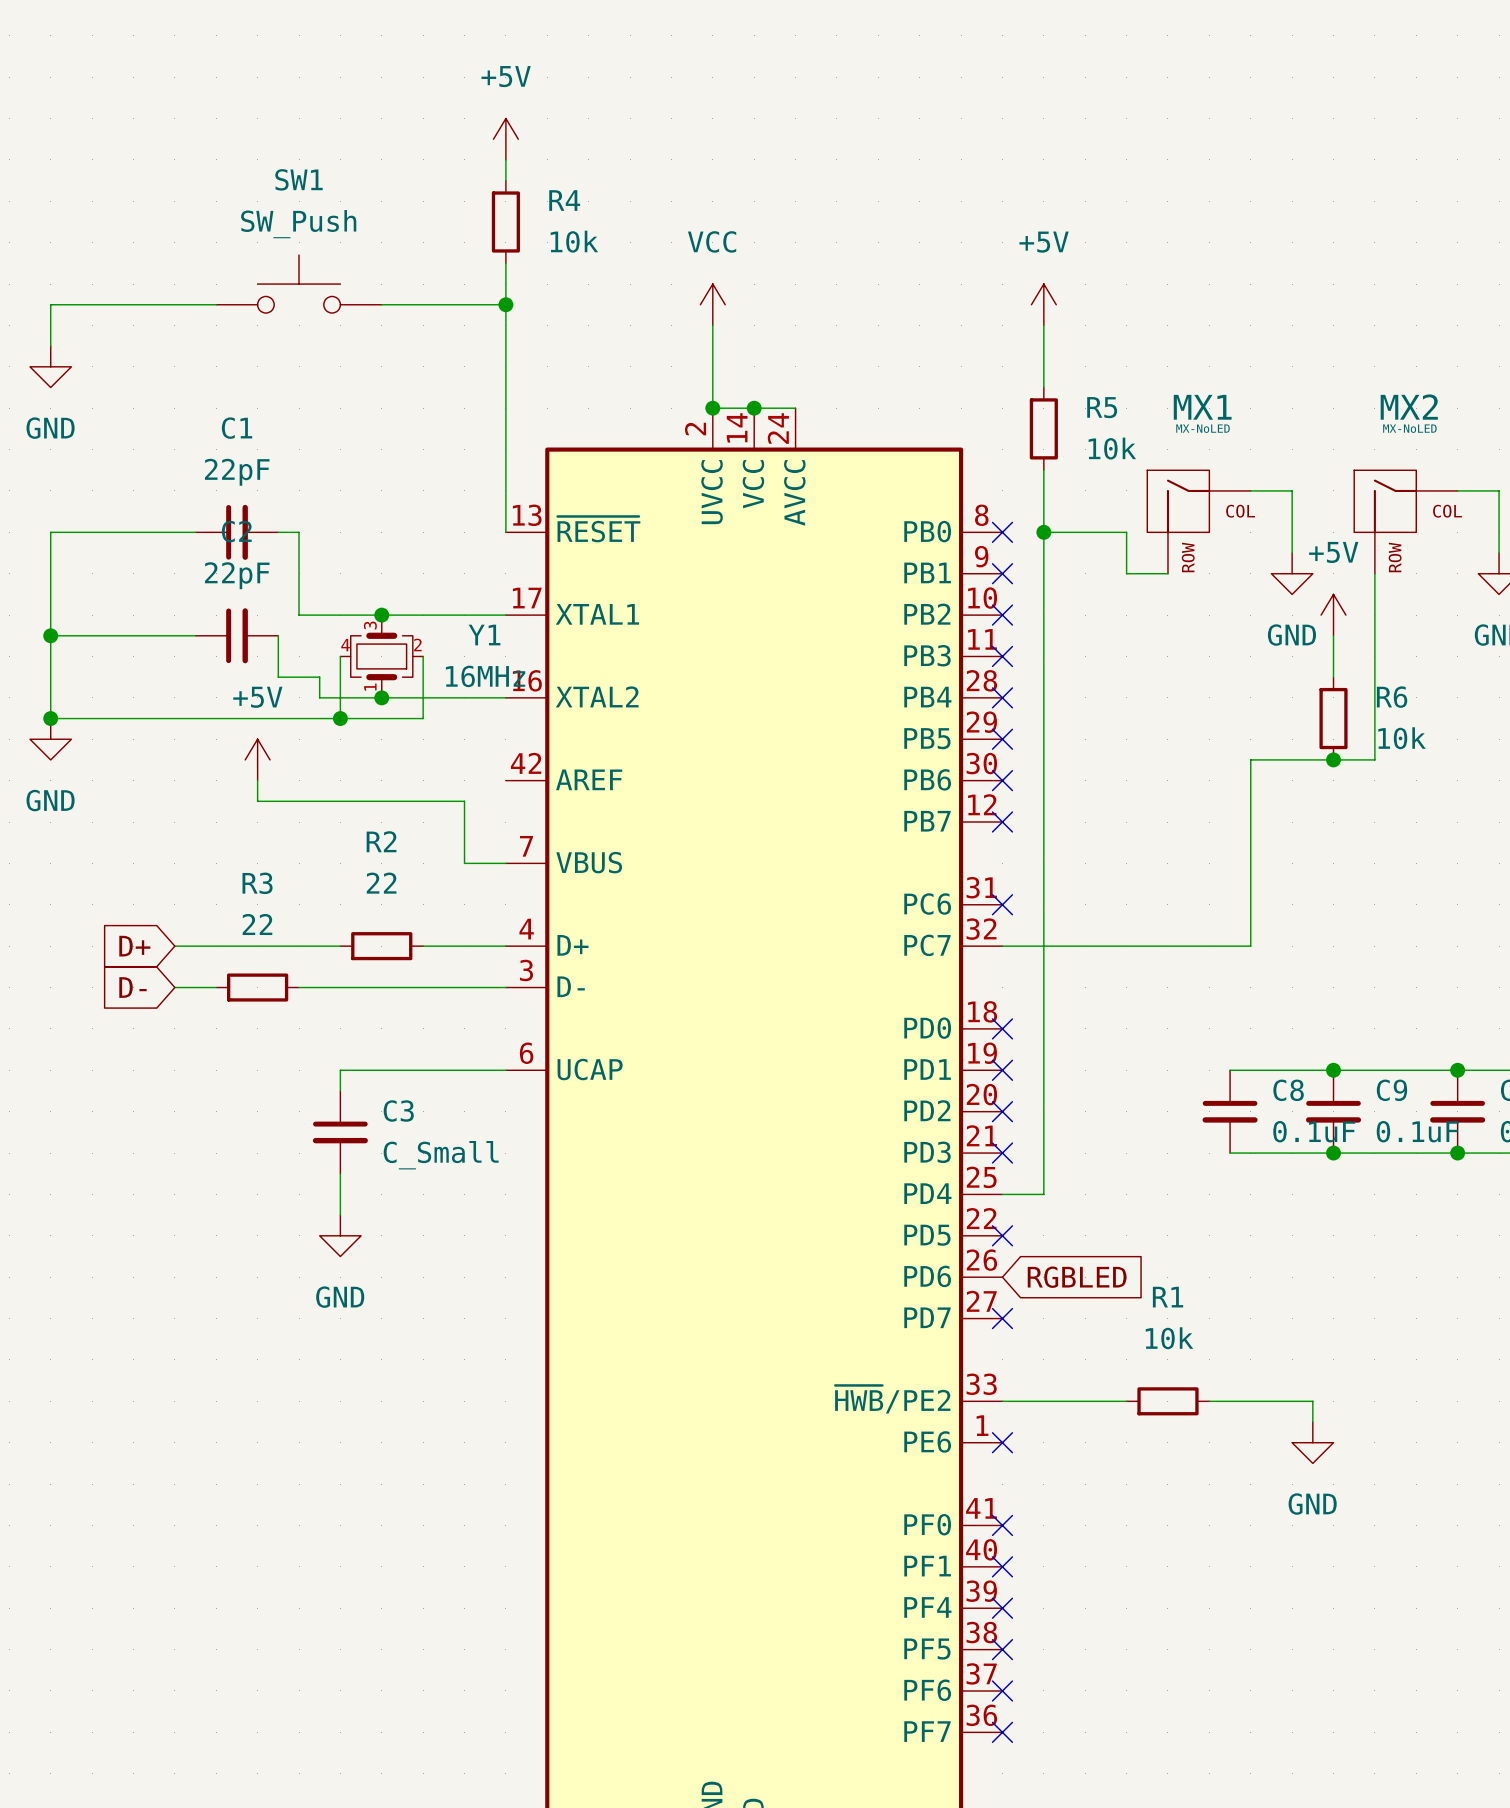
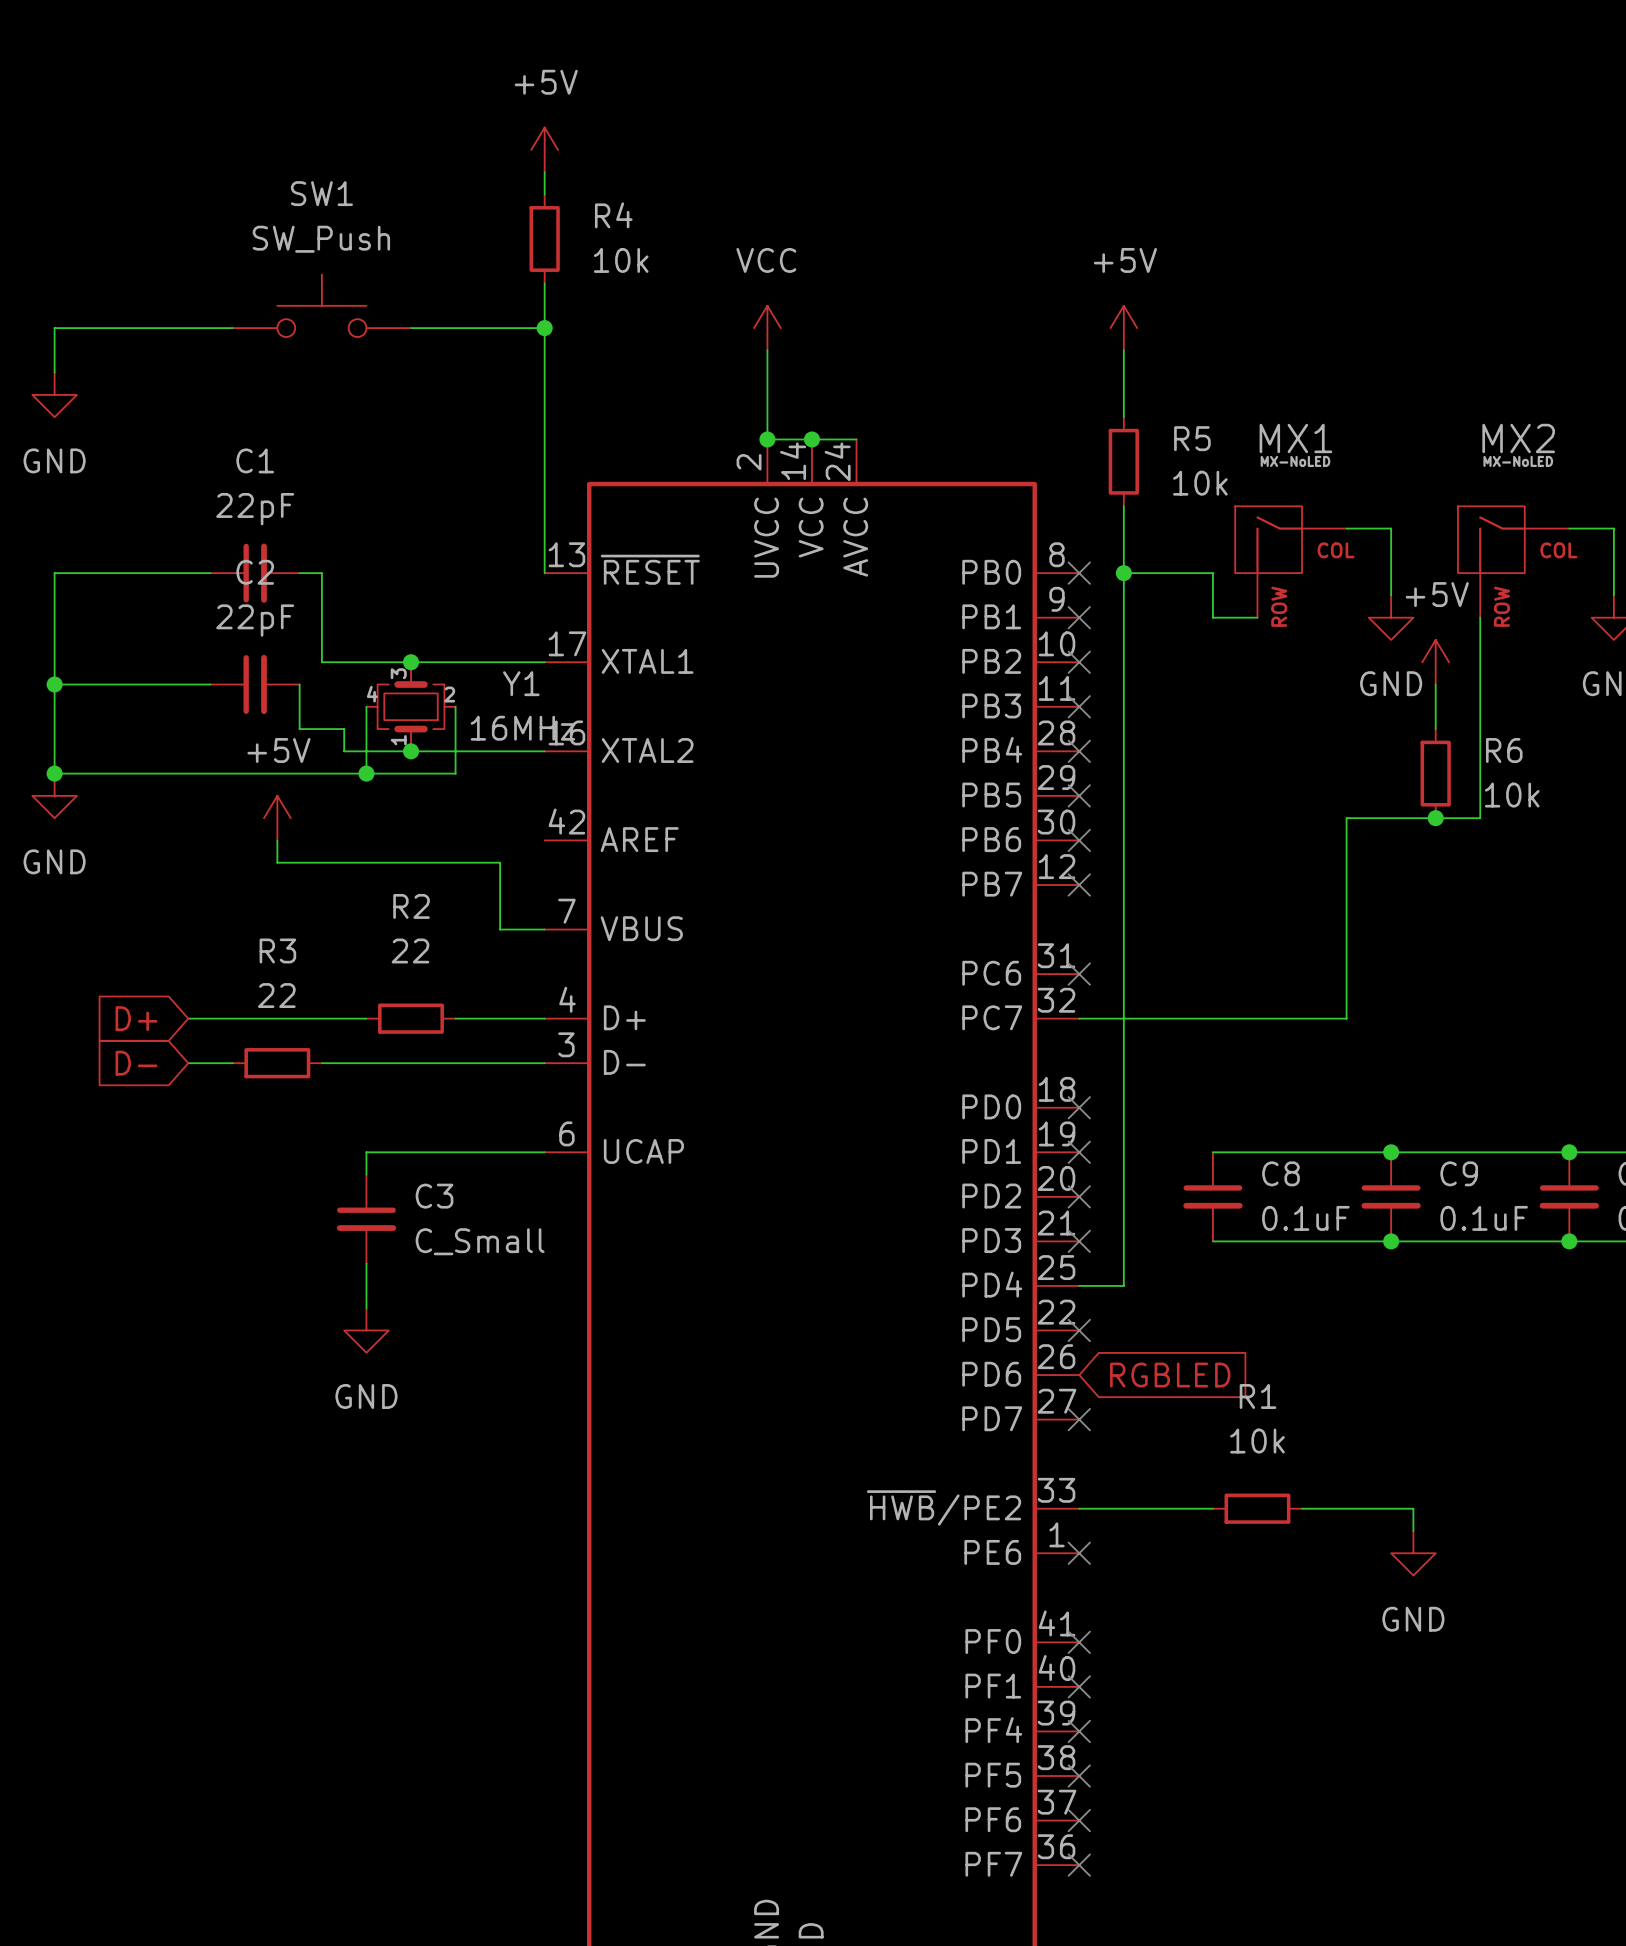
wire: none -> (1212, 1152) (1324, 1152)
junction position: (1333, 1070) -> (1391, 1152)
C8 position: (1230, 1111) -> (1212, 1196)
C9 position: (1333, 1111) -> (1391, 1196)
wire: none -> (1212, 1241) (1324, 1241)
junction position: (1333, 1153) -> (1391, 1241)

